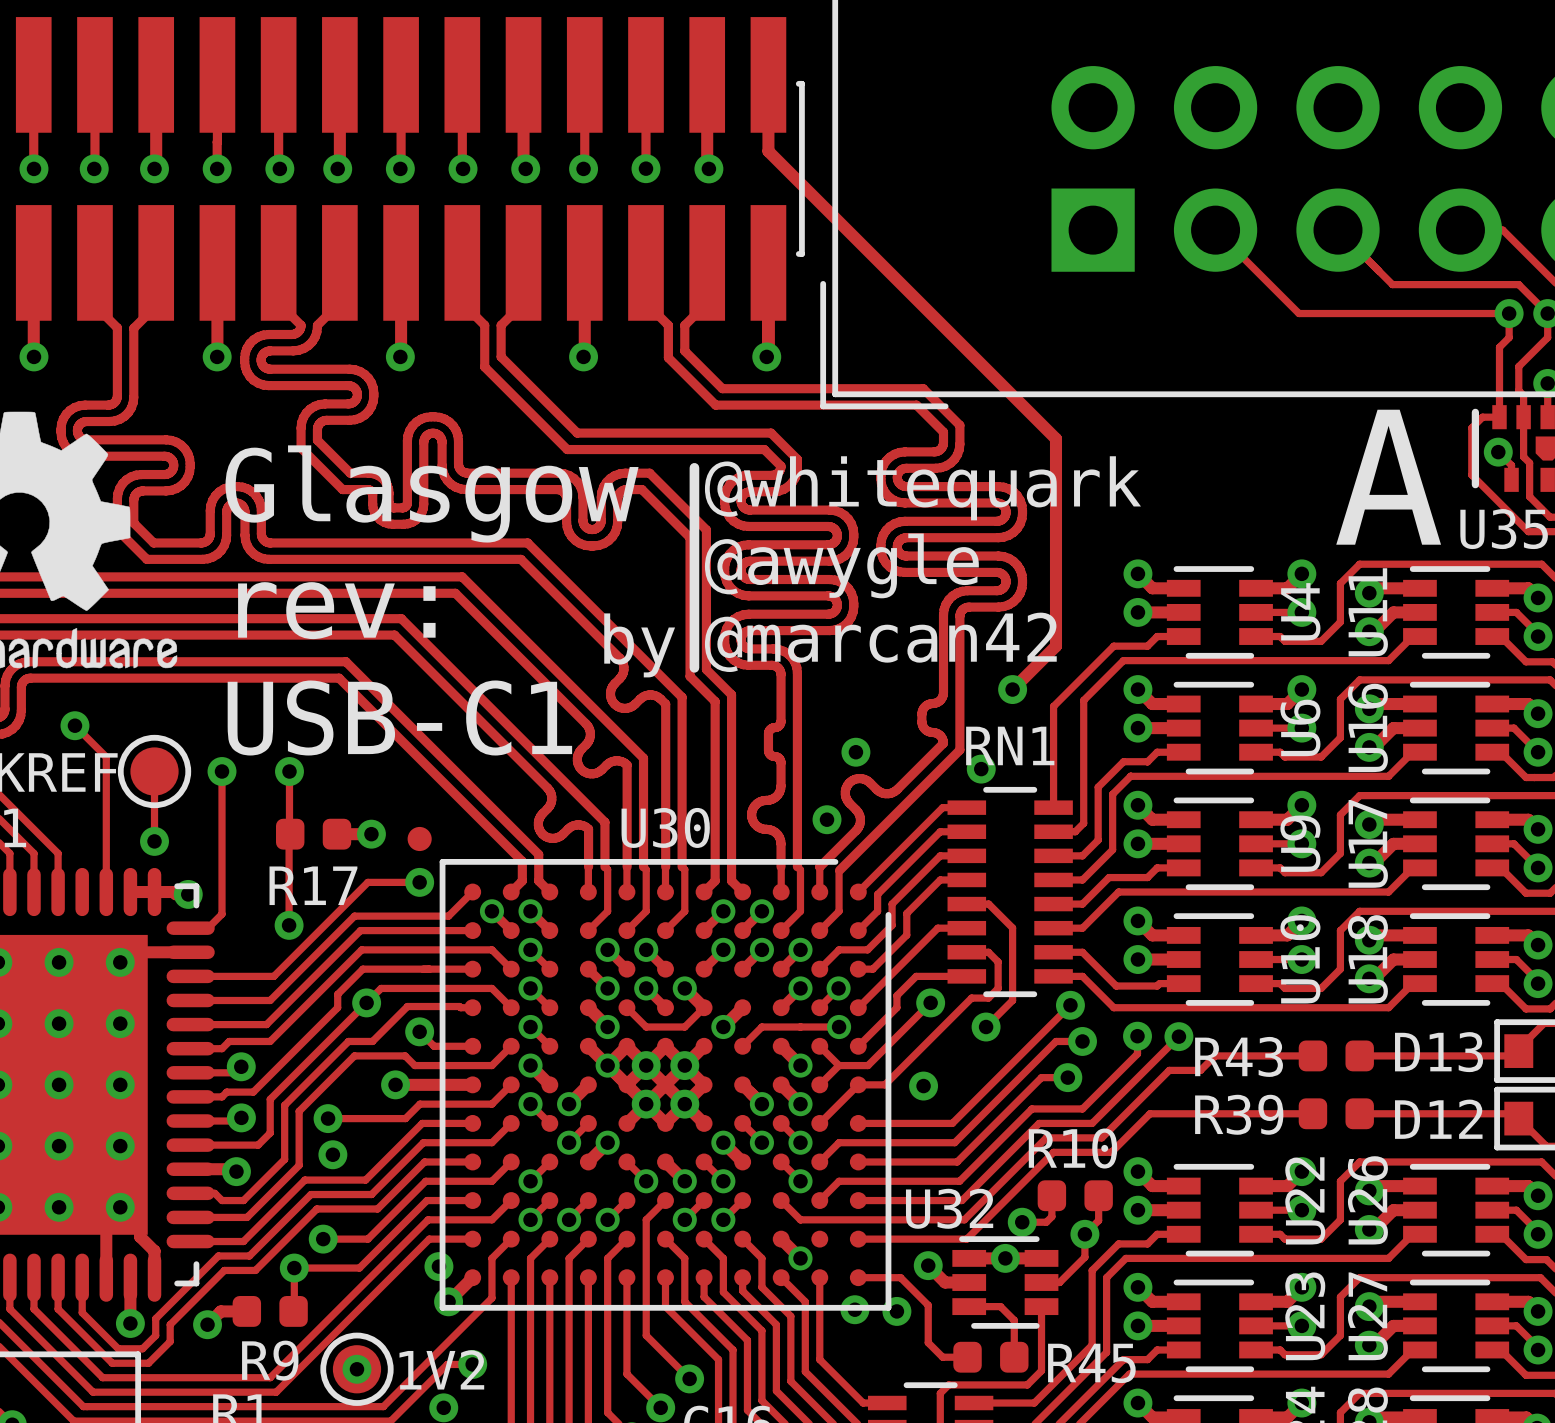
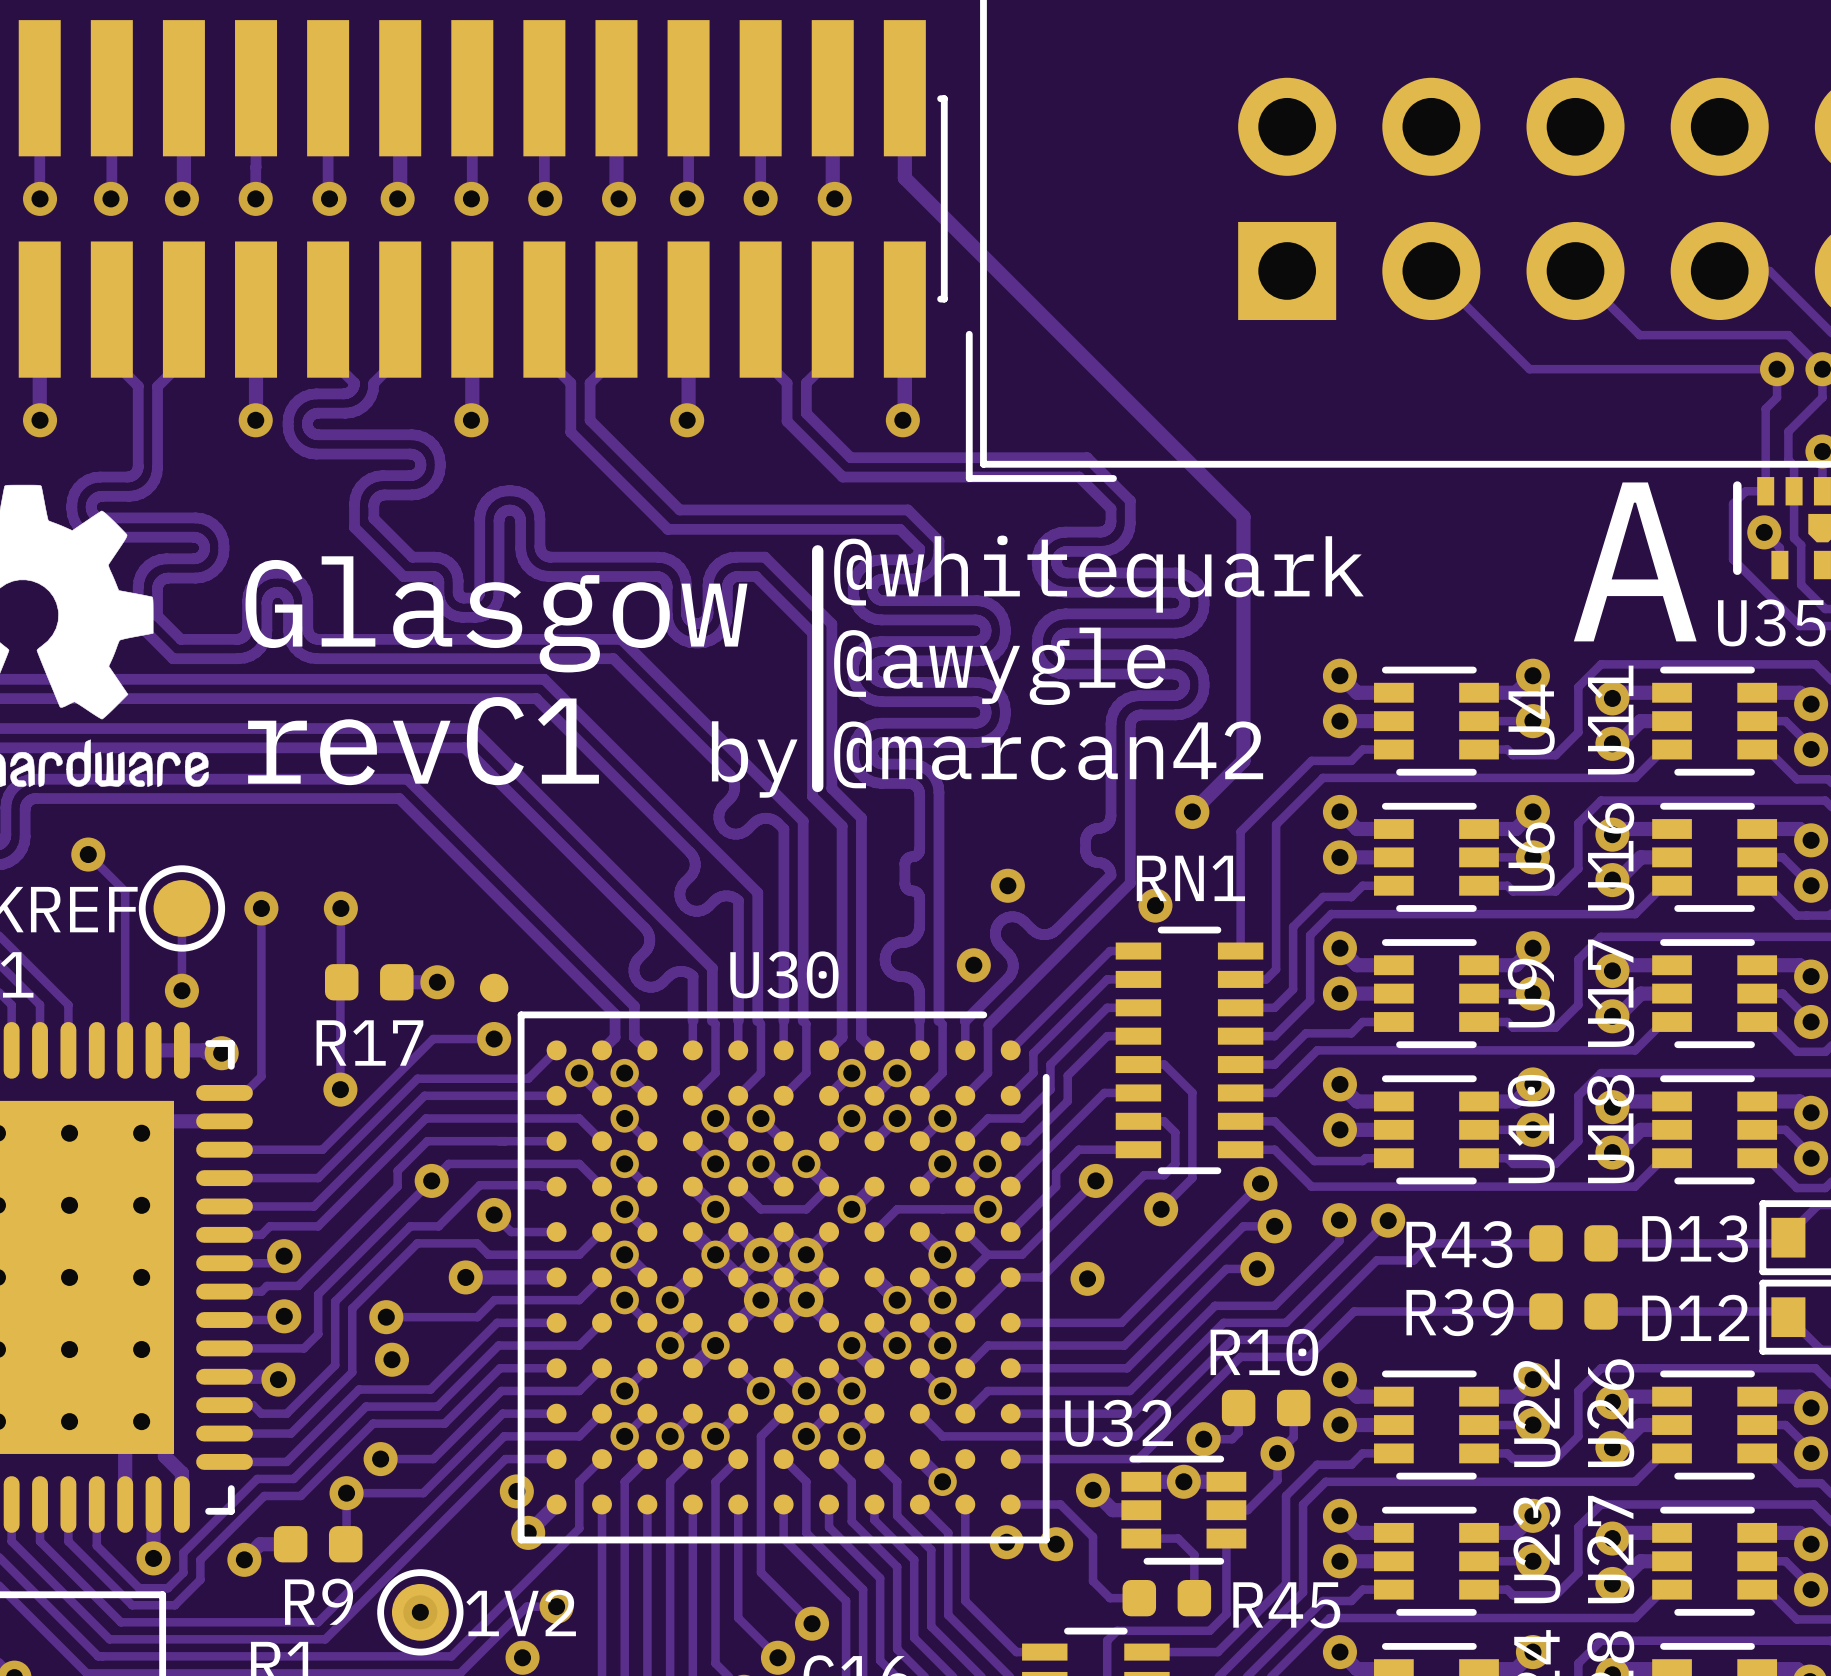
text position: Glasgow (432, 493) -> Glasgow (496, 614)
text: rev: (336, 610) -> revC1 (423, 741)
text: USB-C1 (399, 717) -> none

